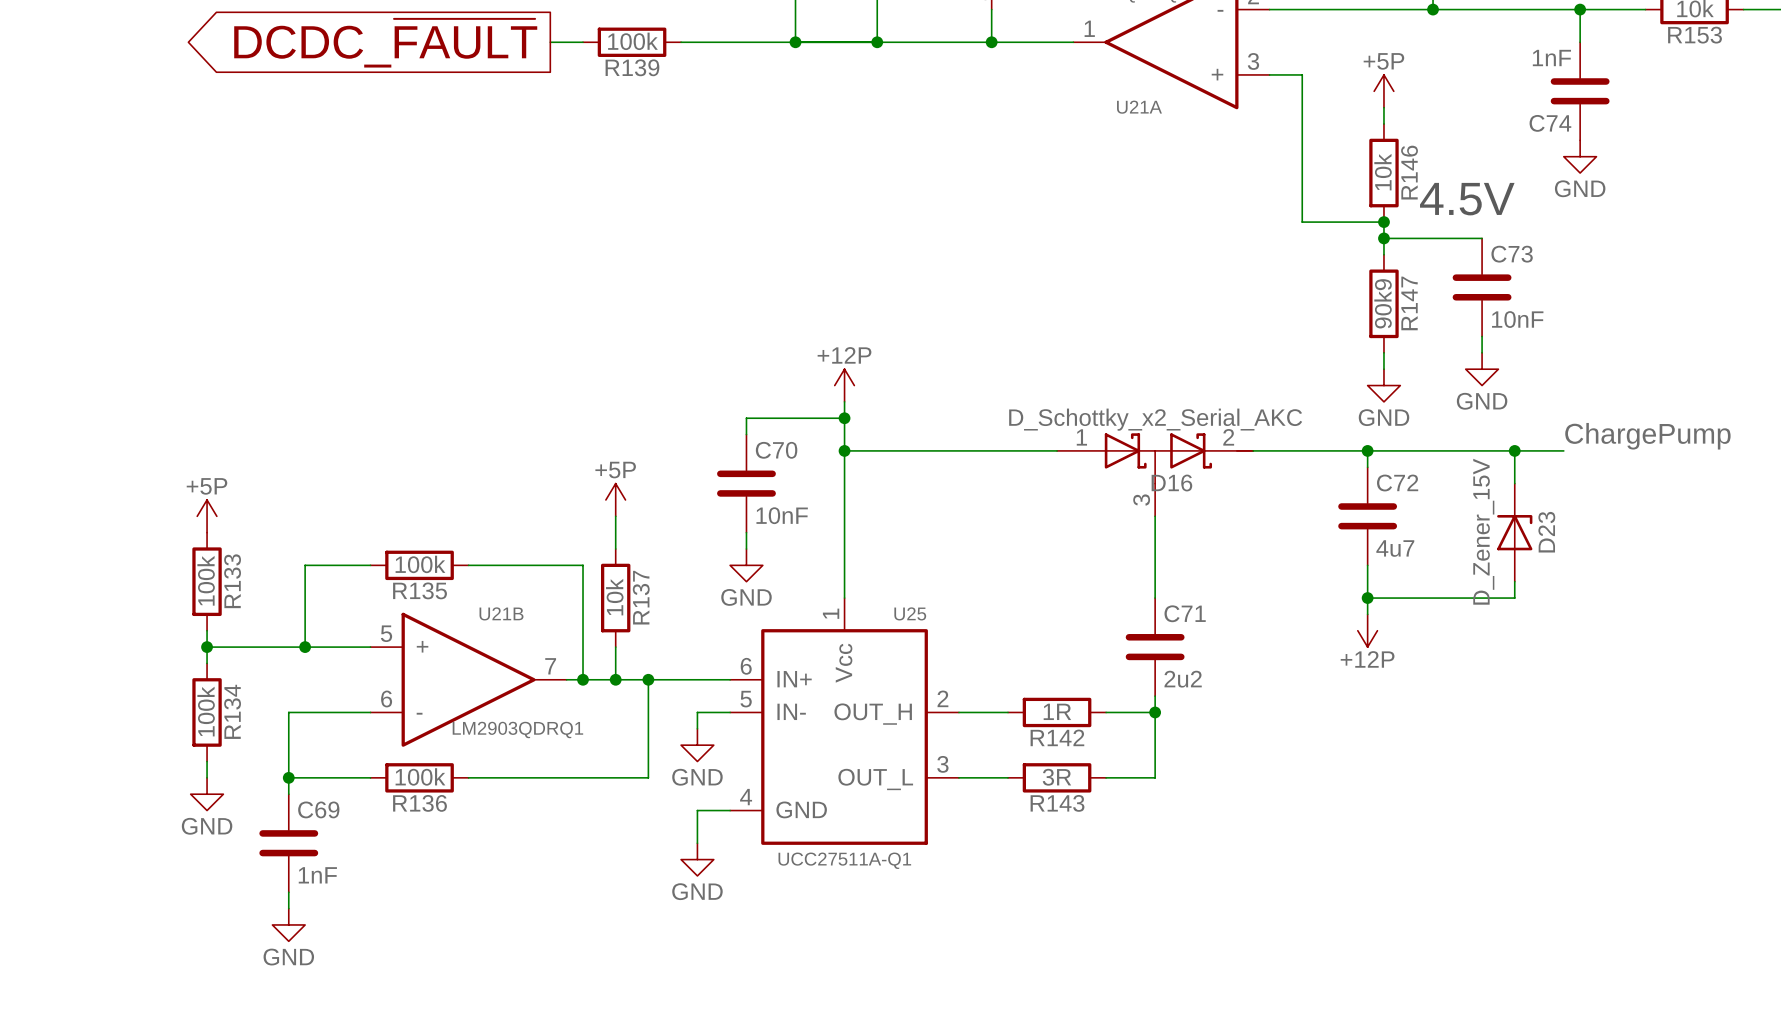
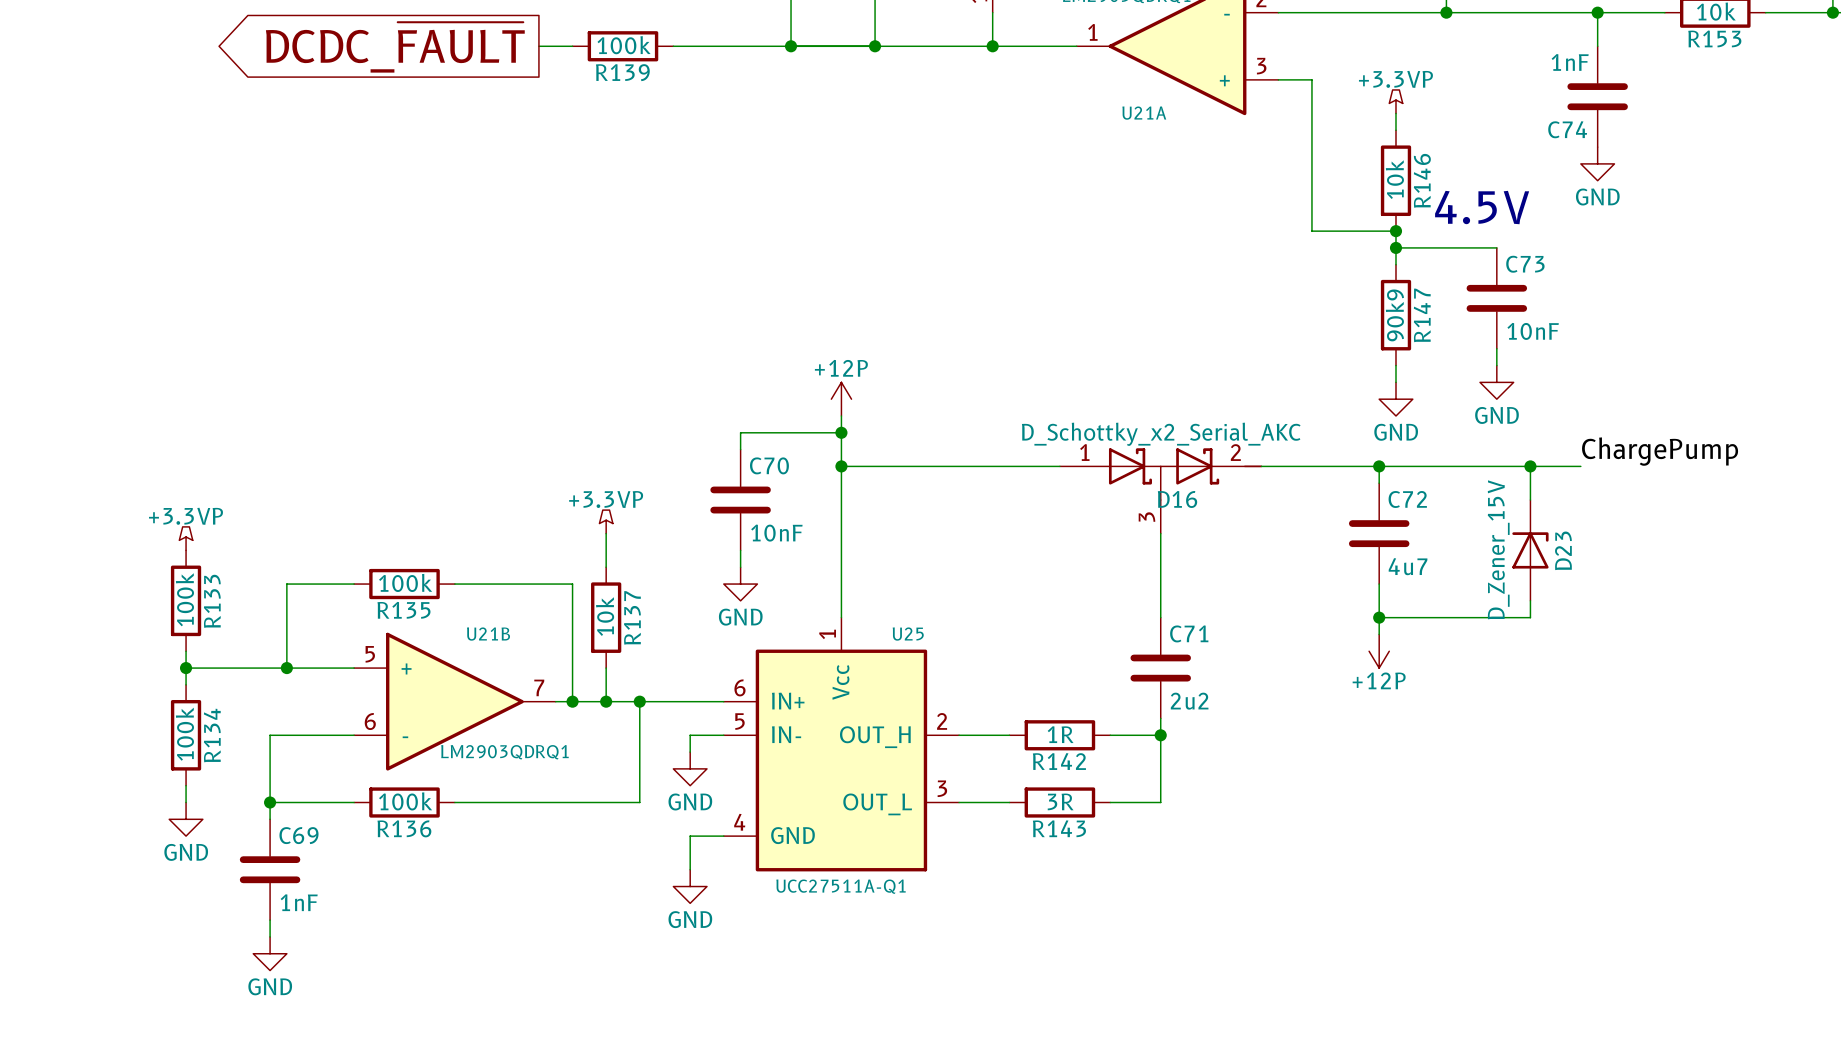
power symbol: +5P (1383, 91) -> +3.3VP (1395, 101)
power symbol: +5P (615, 499) -> +3.3VP (606, 521)
power symbol: +5P (207, 516) -> +3.3VP (186, 538)

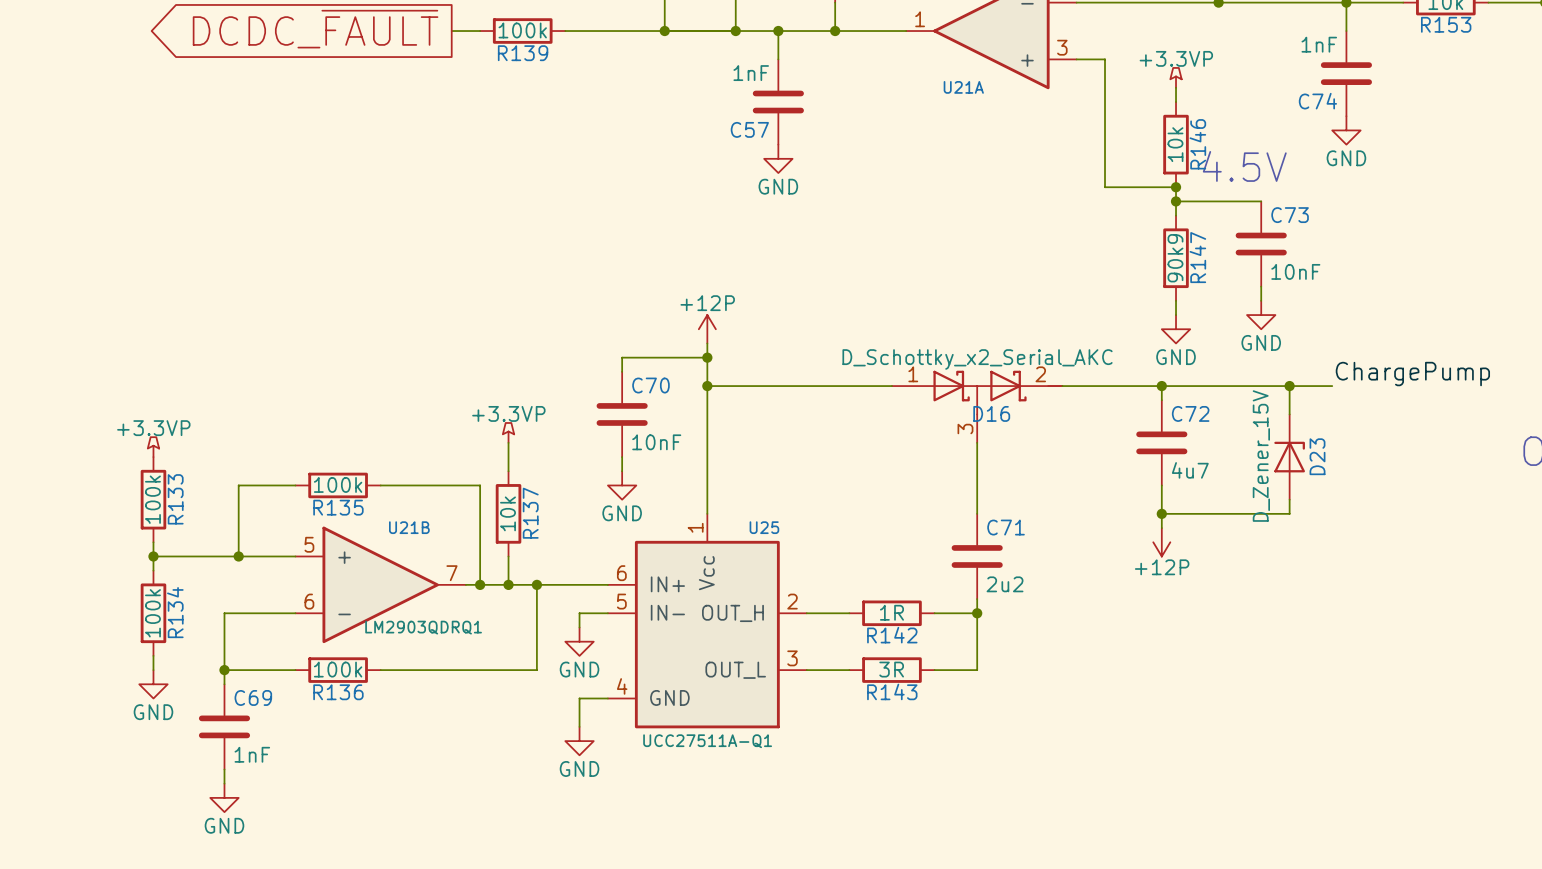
wire: none -> (778, 31) (778, 59)
junction: none -> (778, 31)
C57: none -> 1nF (778, 102)
power symbol: none -> GND (778, 158)

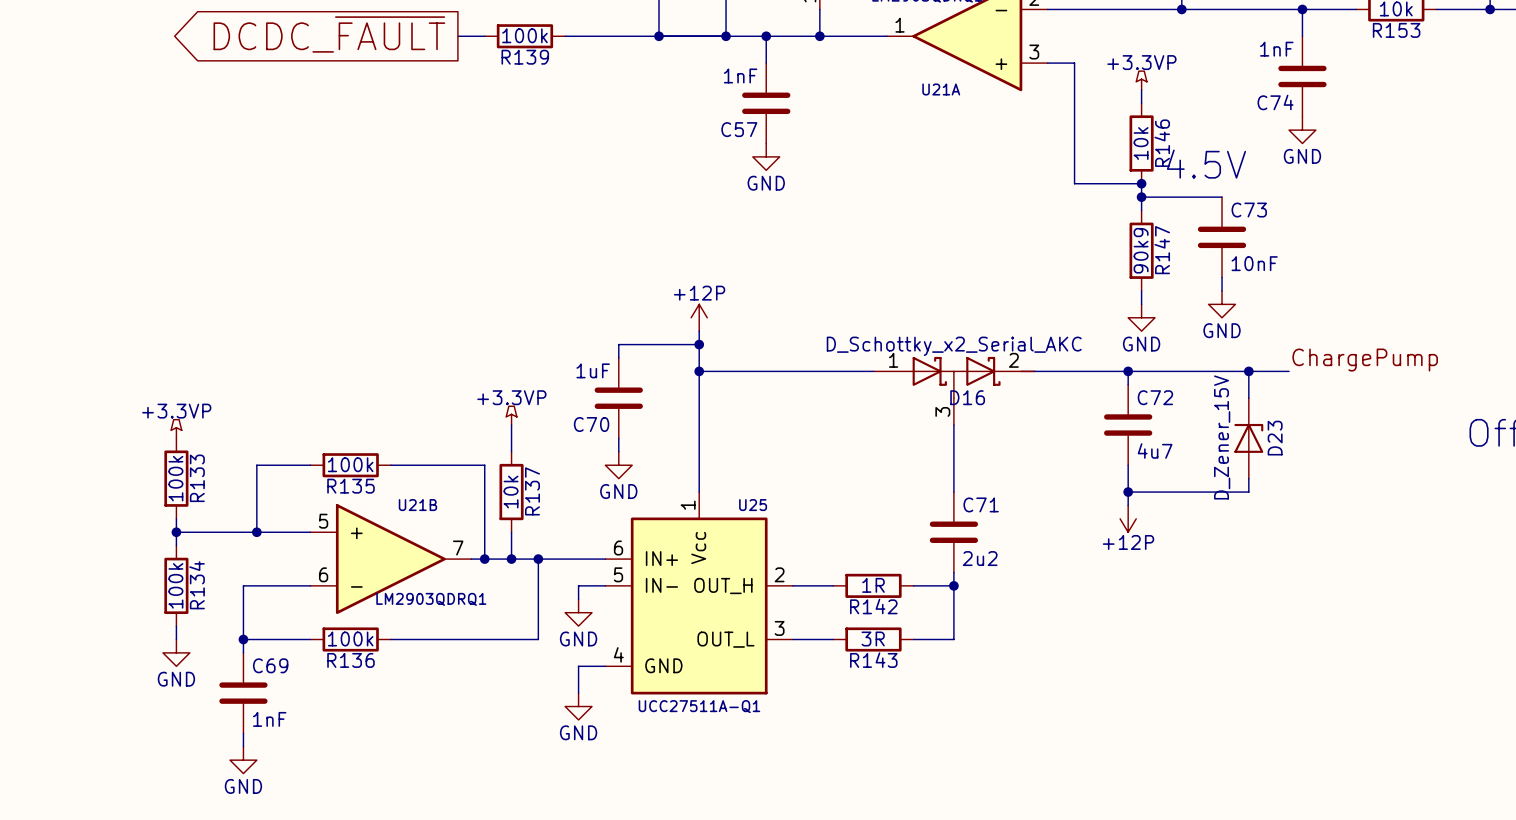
C70 name position: C70 (650, 385) -> C70 (591, 424)
C70 value: 10nF (656, 442) -> 1uF (593, 370)

